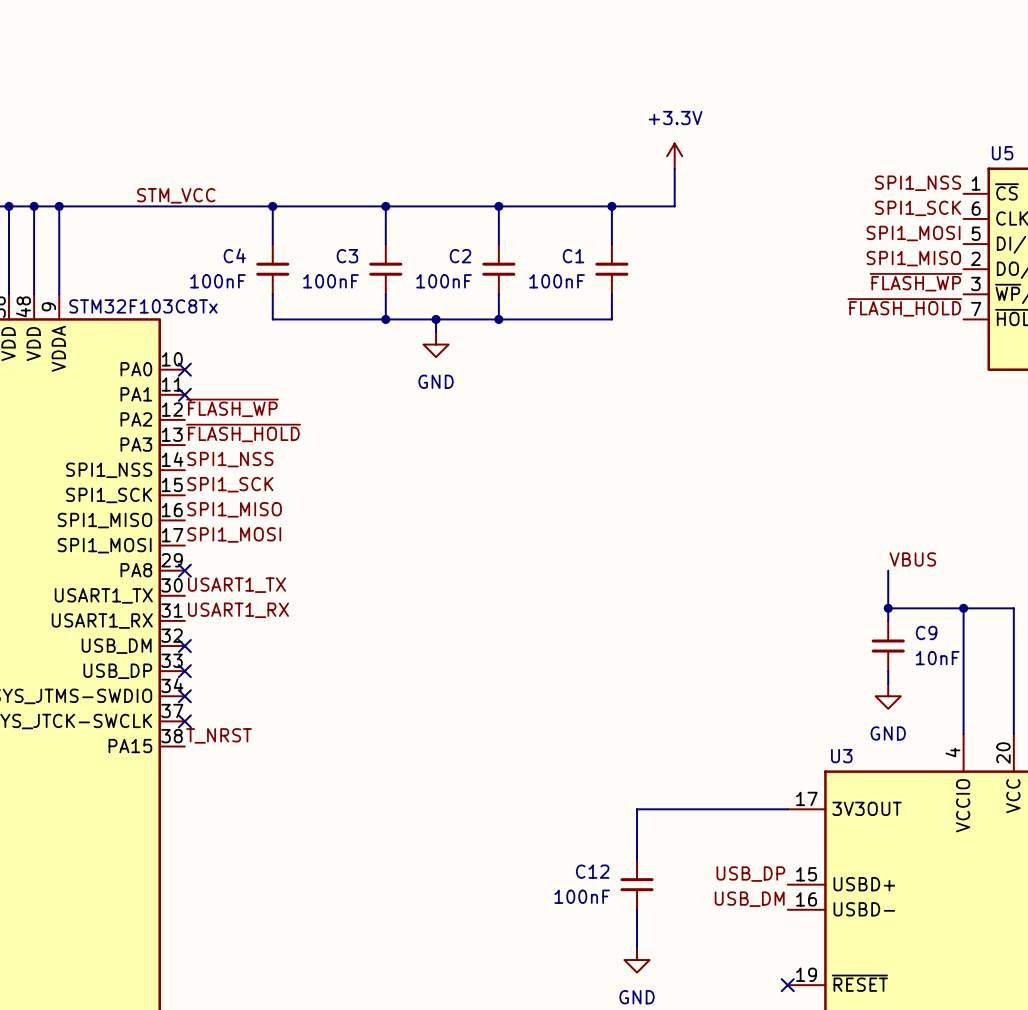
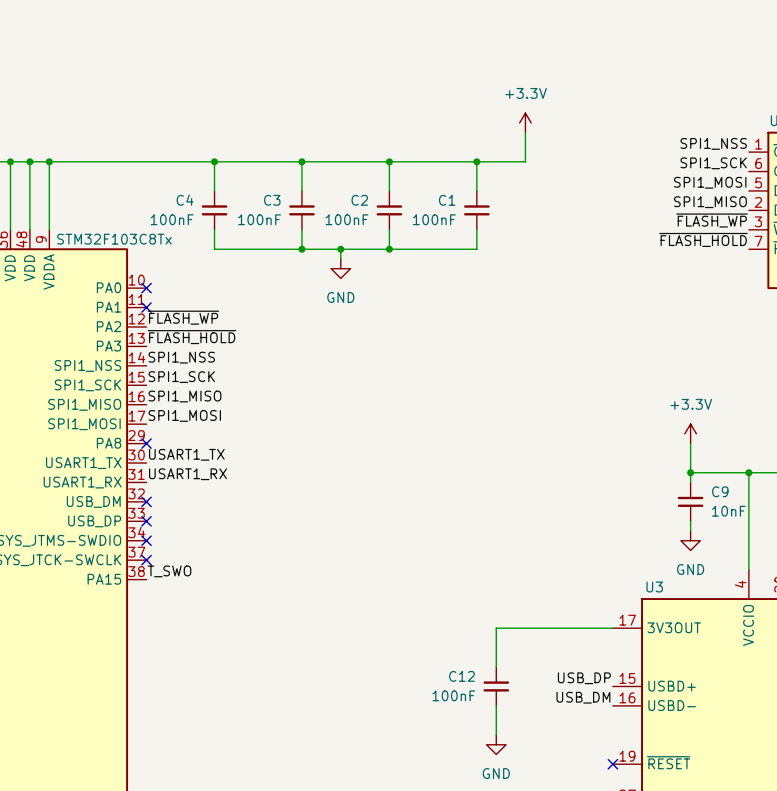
label: STM_VCC (176, 195) -> none
power symbol: none -> +3.3V (690, 433)
label: VBUS (912, 559) -> none
label: T_NRST (219, 735) -> T_SWO (169, 571)

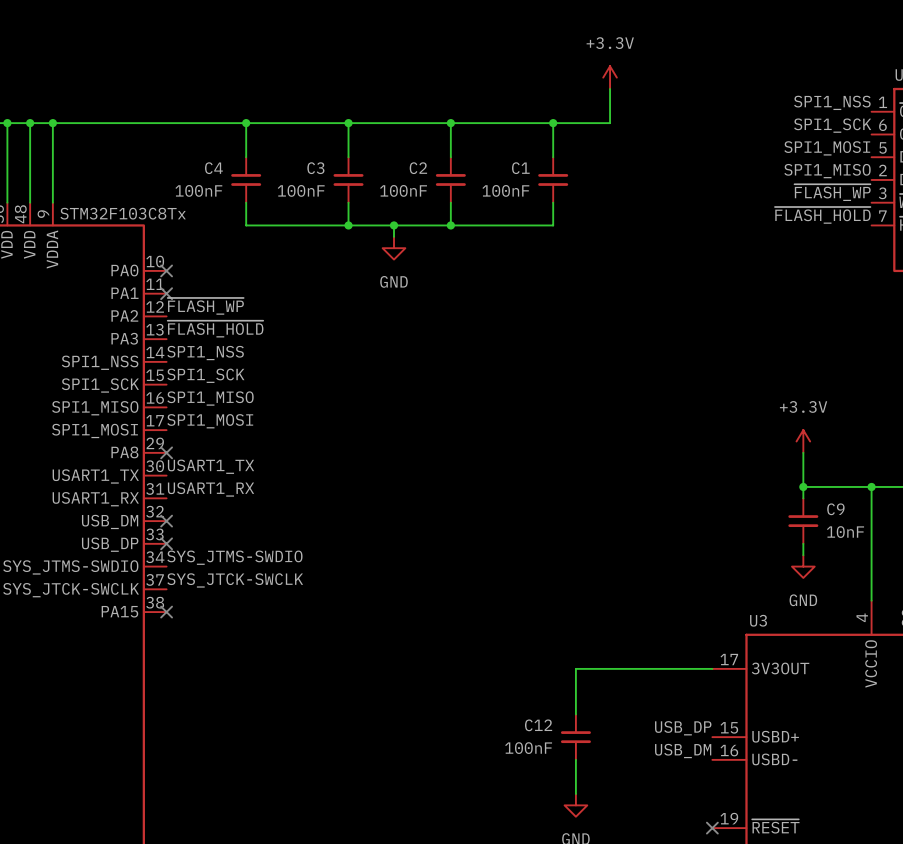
label: none -> SYS_JTMS-SWDIO (234, 557)
no-connect mark: (146, 540) -> none
label: none -> SYS_JTCK-SWCLK (235, 580)
no-connect mark: (146, 560) -> none
label: T_SWO (169, 571) -> none
no-connect mark: none -> (166, 612)

